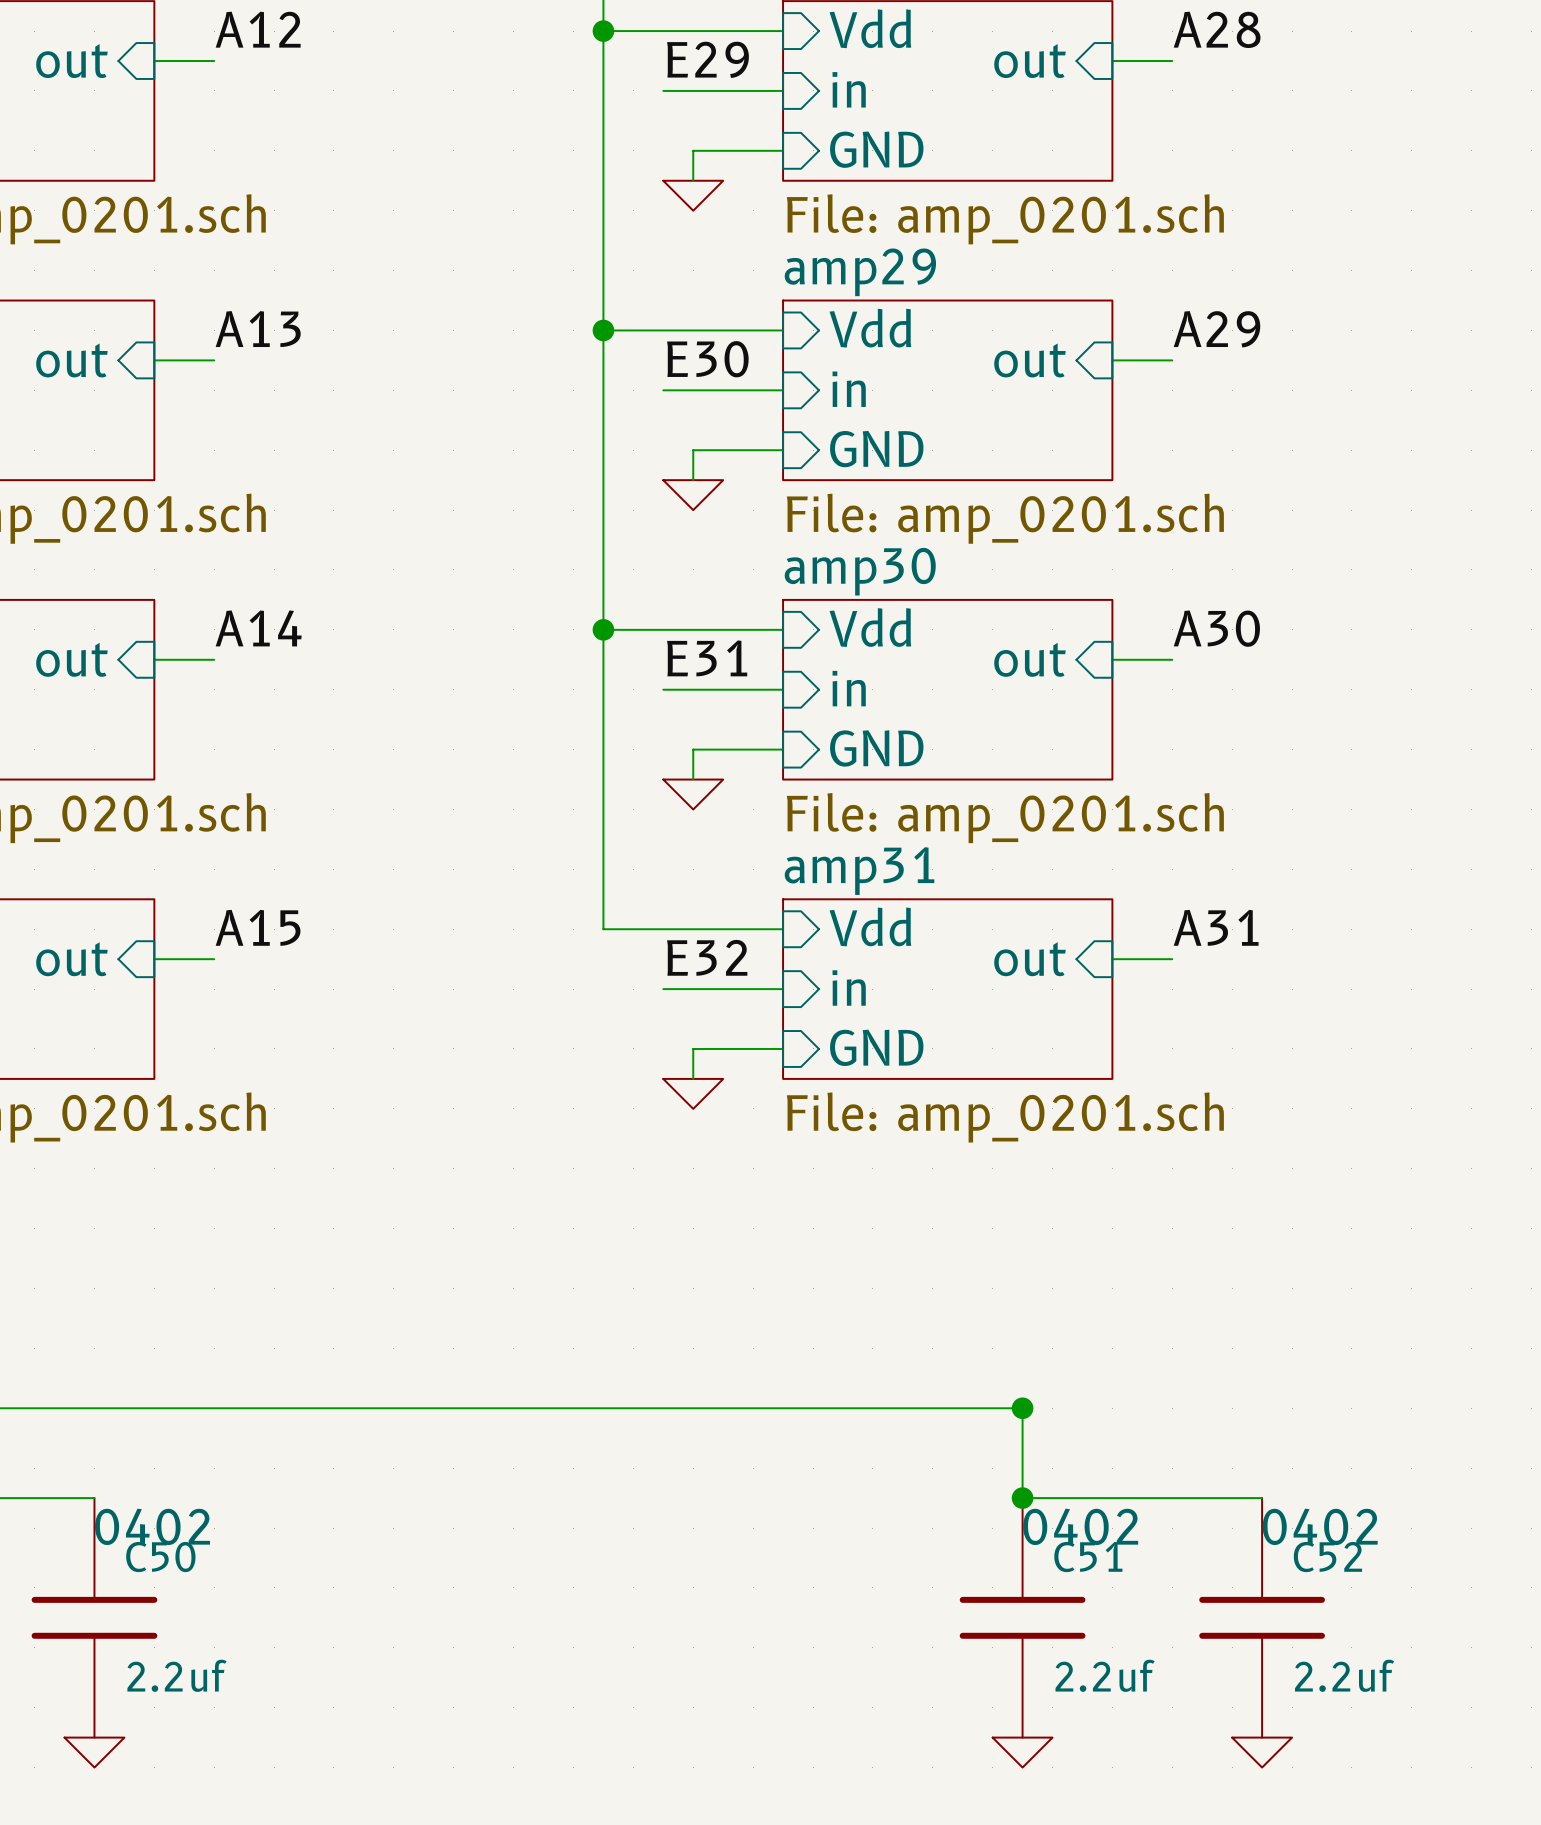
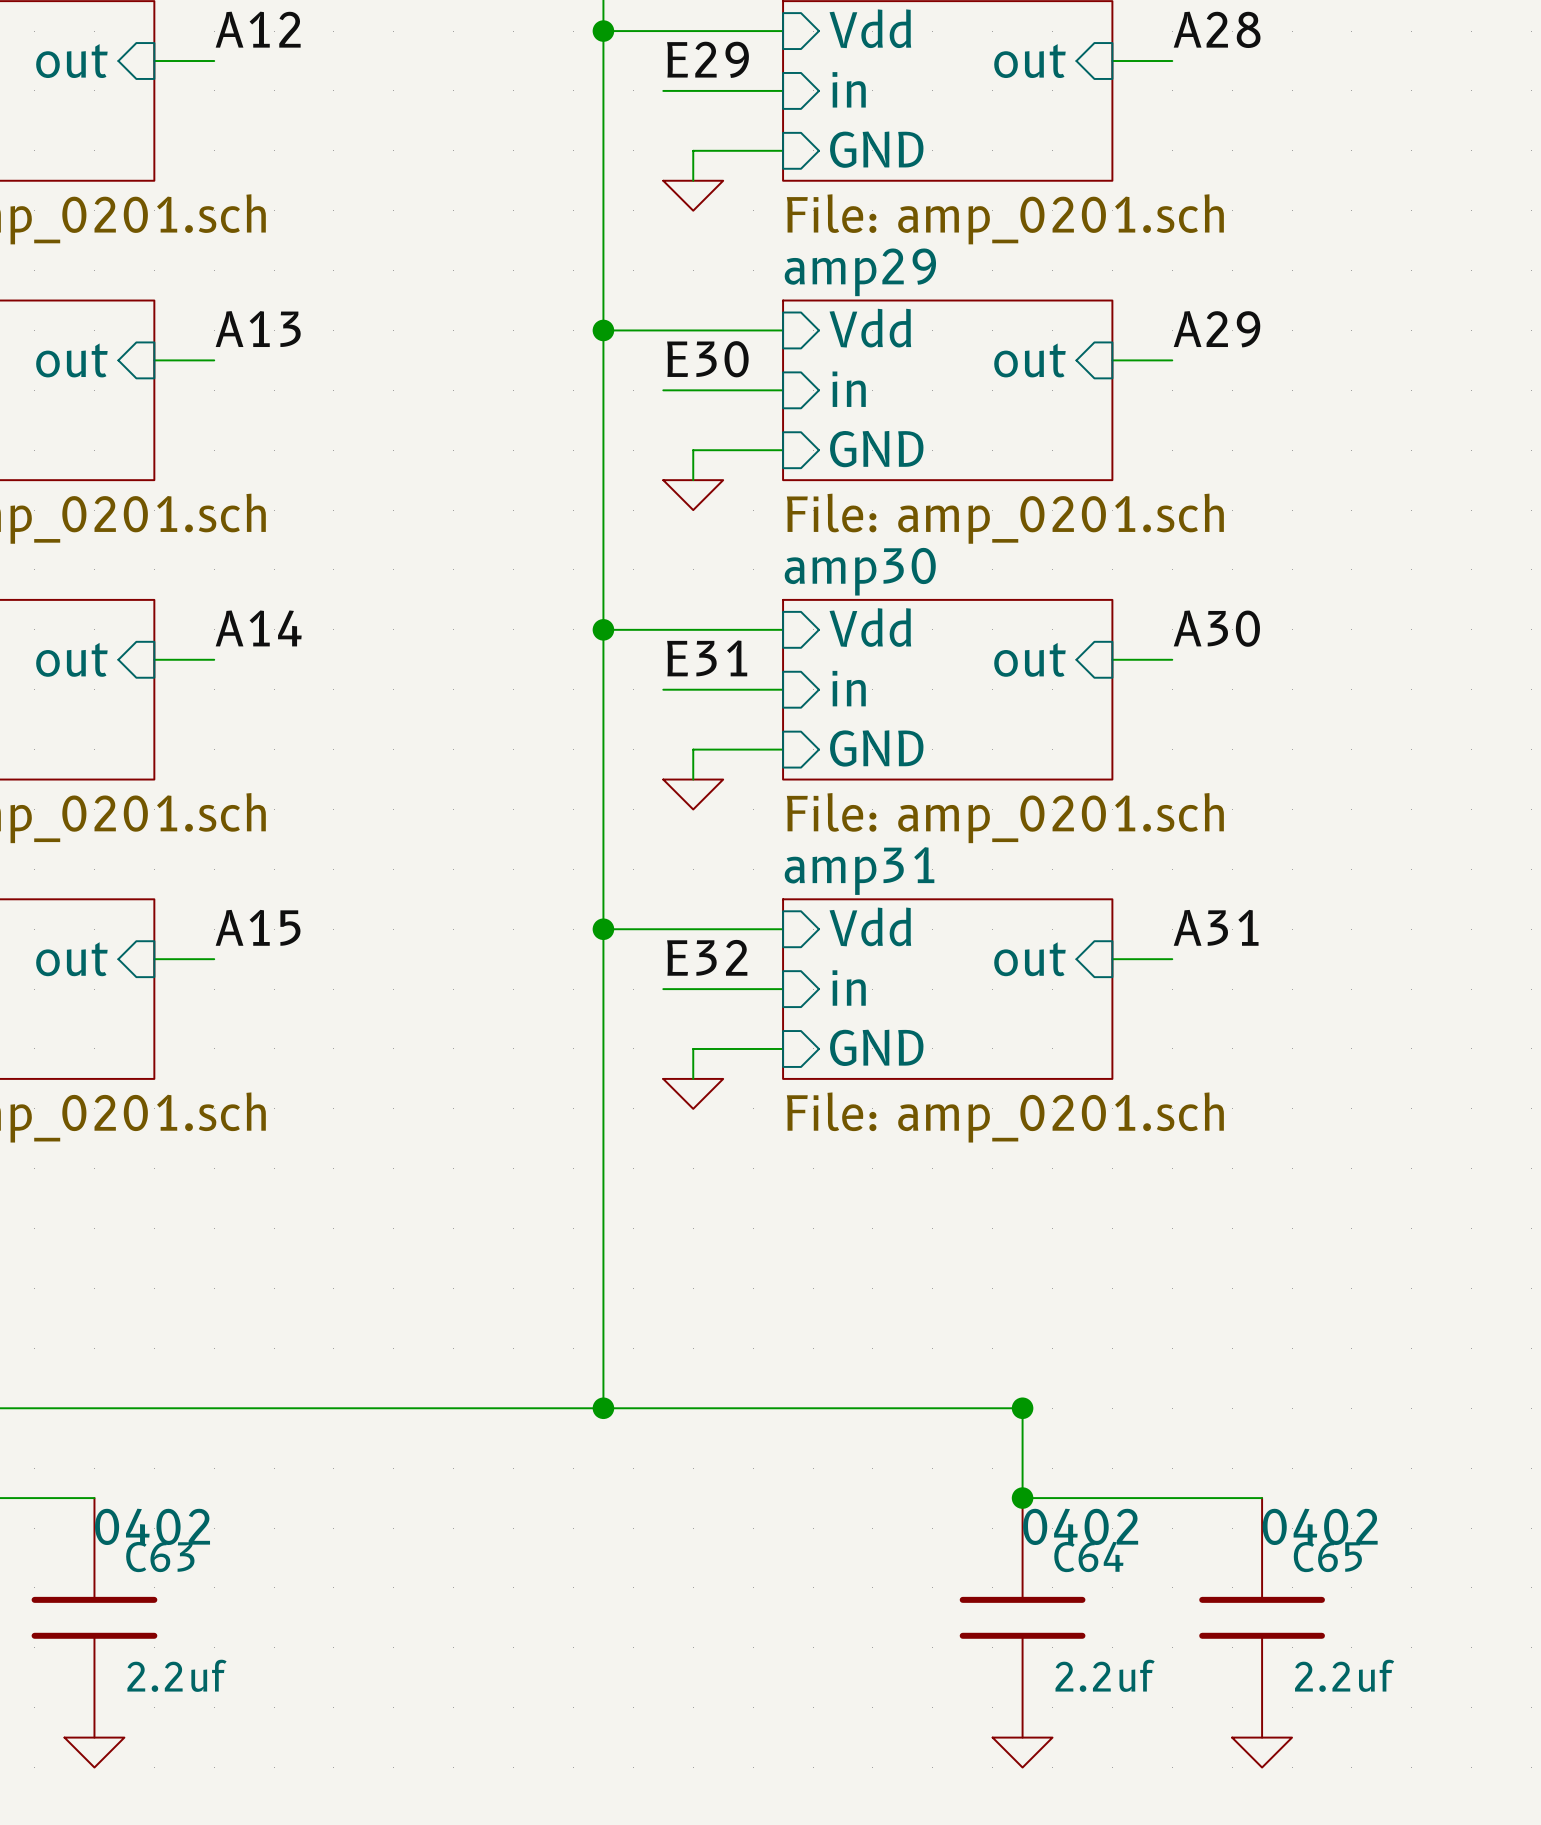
wire: none -> (603, 929) (603, 1408)
junction: none -> (603, 929)
junction: none -> (603, 1408)
C50 name: C50 (160, 1557) -> C63 (160, 1557)
C51 name: C51 (1088, 1557) -> C64 (1088, 1557)
C52 name: C52 (1327, 1557) -> C65 (1327, 1557)

